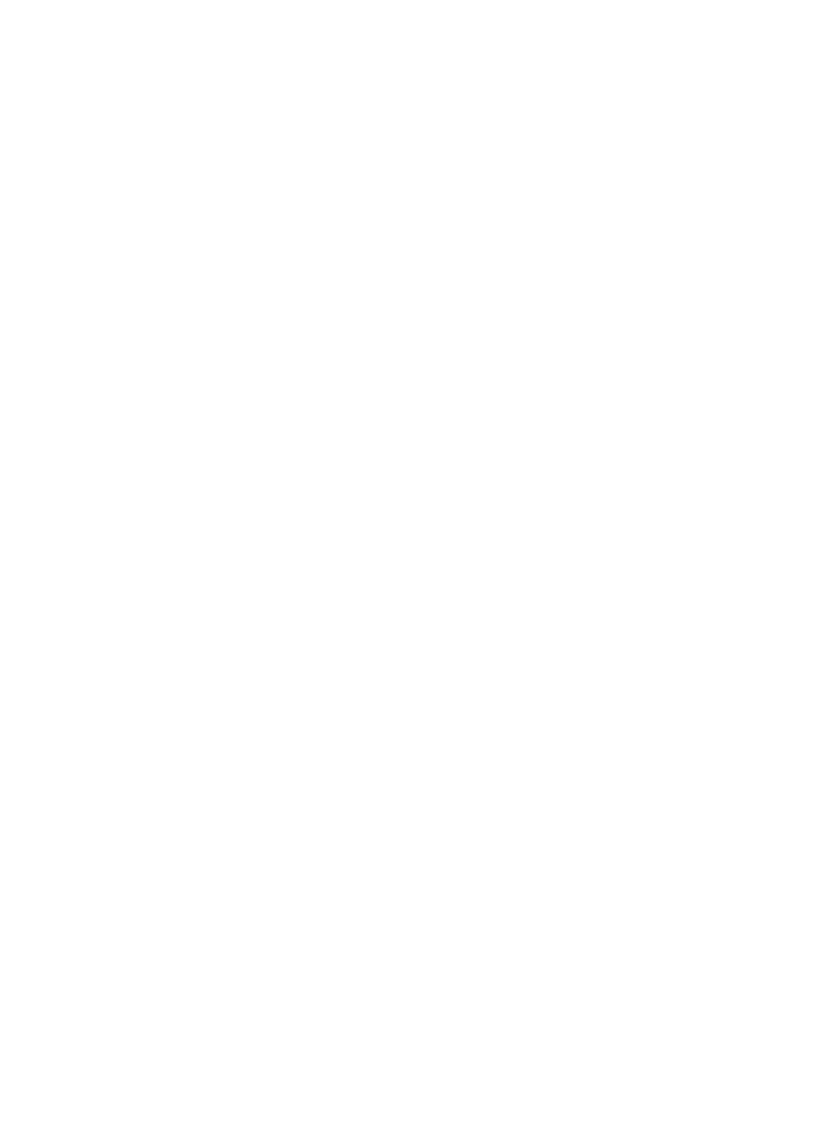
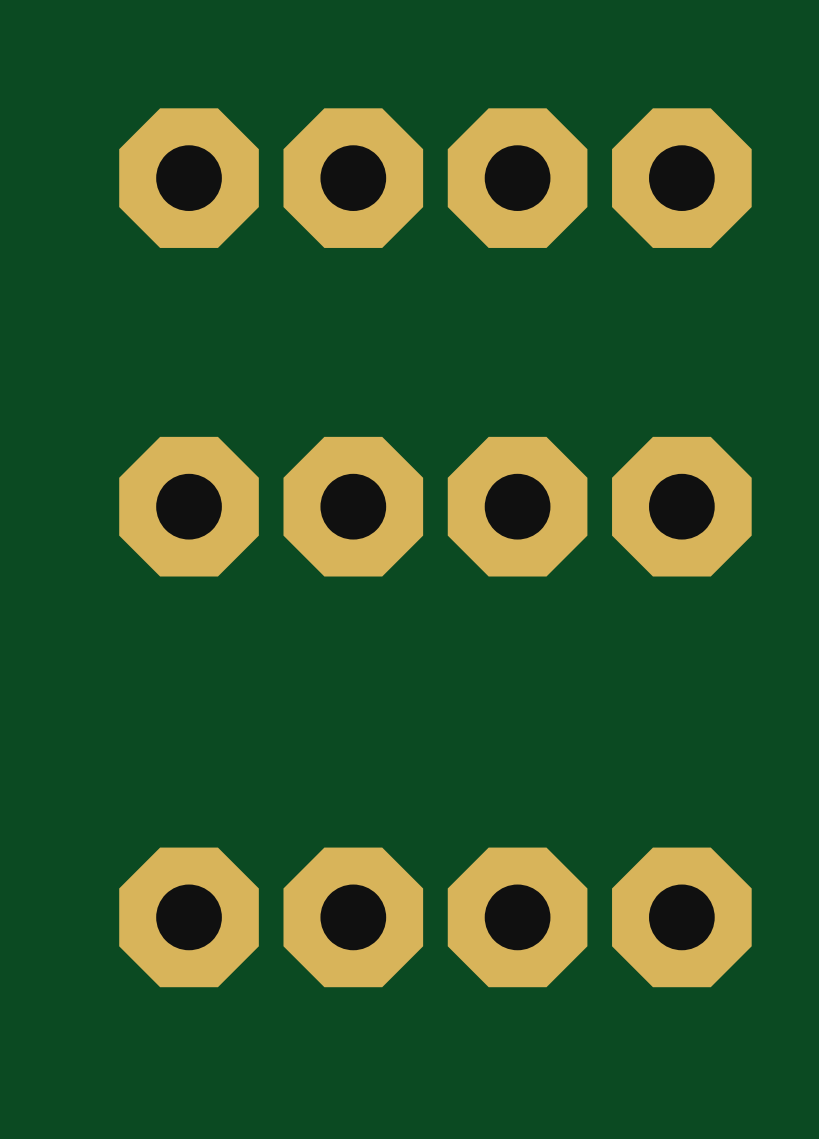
part: none -> (189, 178)
part: none -> (353, 178)
part: none -> (517, 178)
part: none -> (681, 178)
part: none -> (189, 506)
part: none -> (353, 506)
part: none -> (517, 506)
part: none -> (681, 506)
part: none -> (189, 917)
part: none -> (353, 917)
part: none -> (517, 917)
part: none -> (681, 917)

